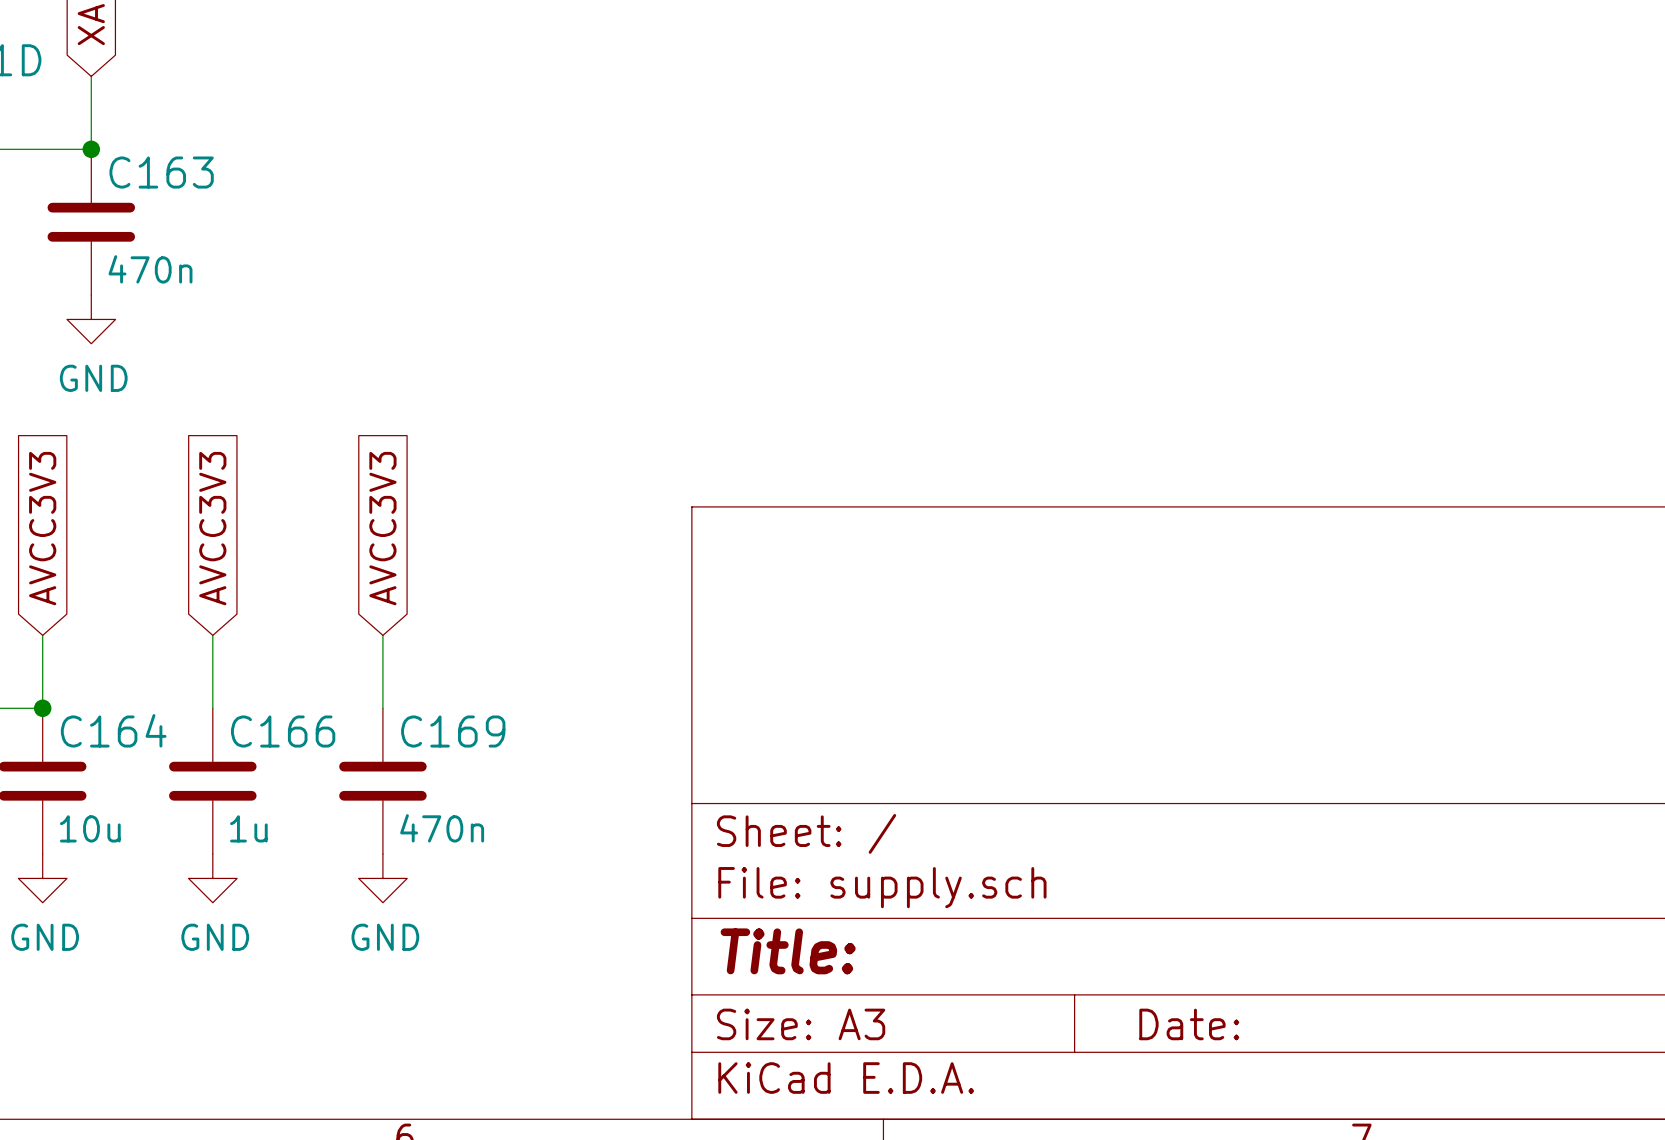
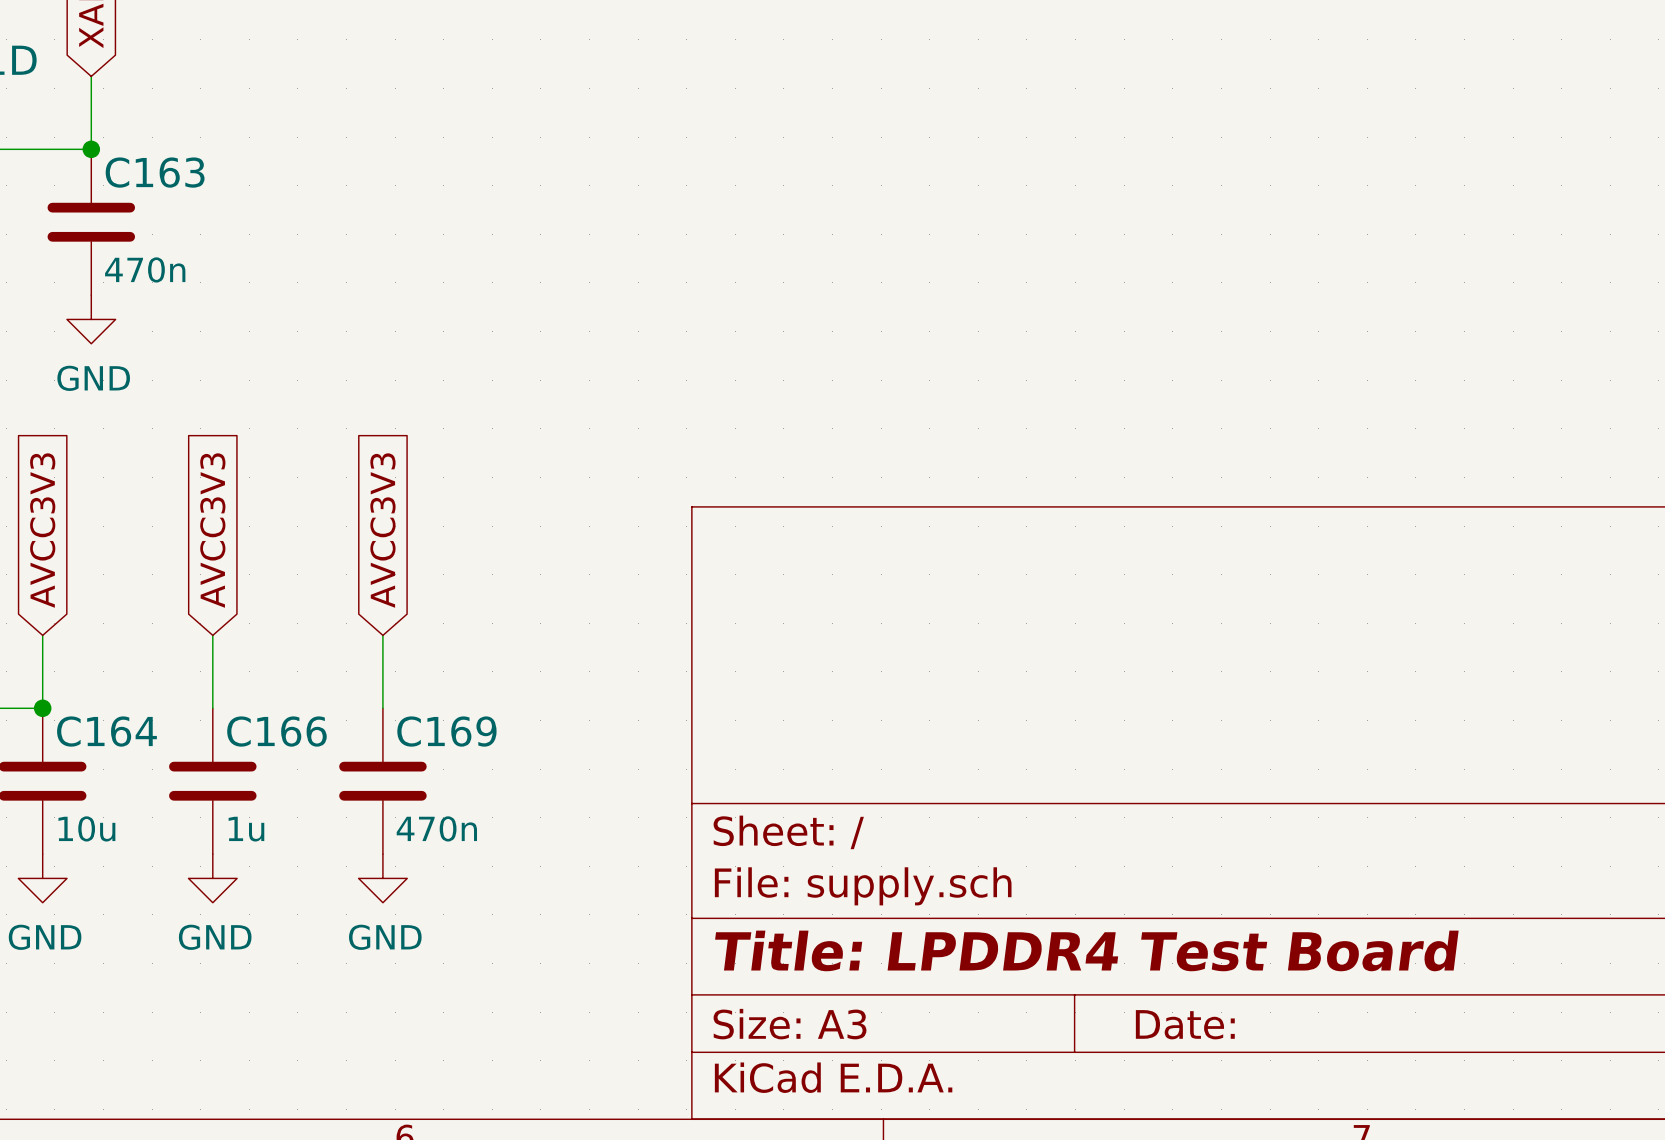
title block: Title: (788, 951) -> Title: LPDDR4 Test Board (1086, 950)

